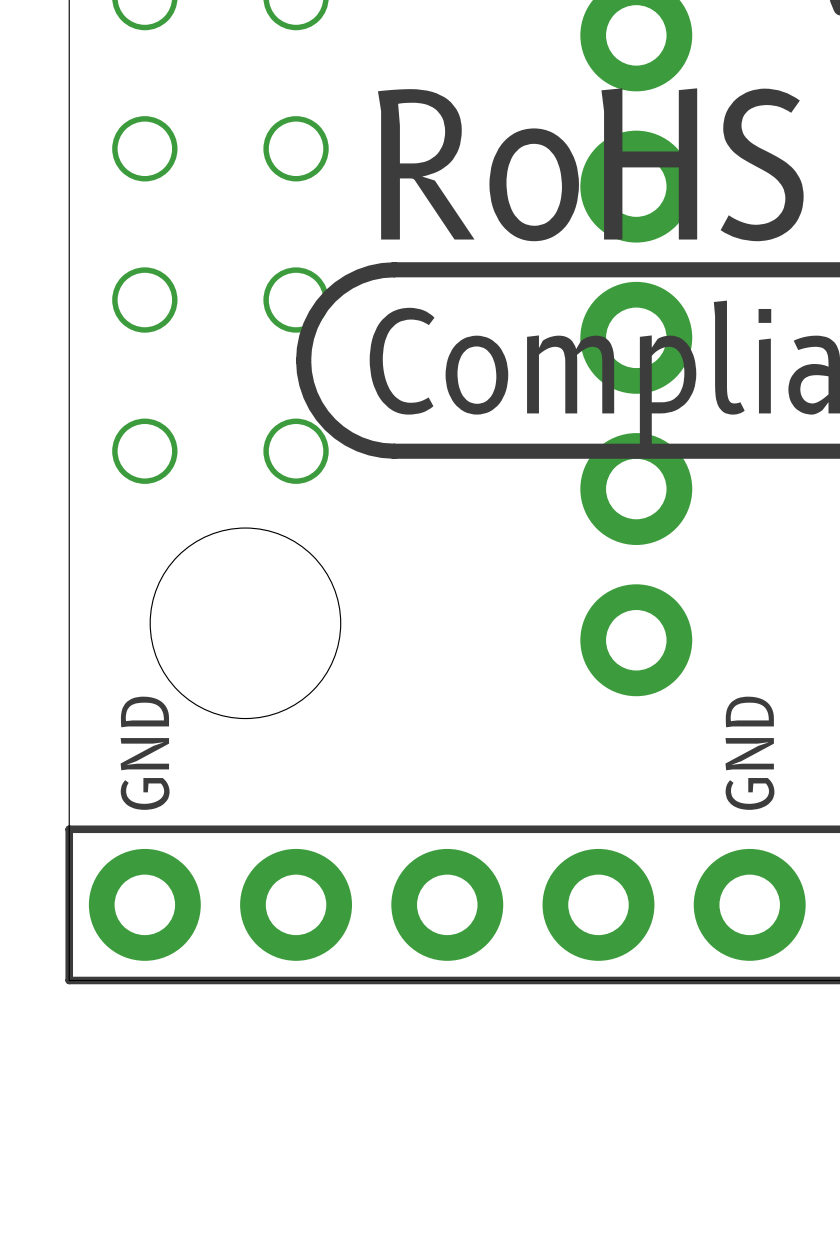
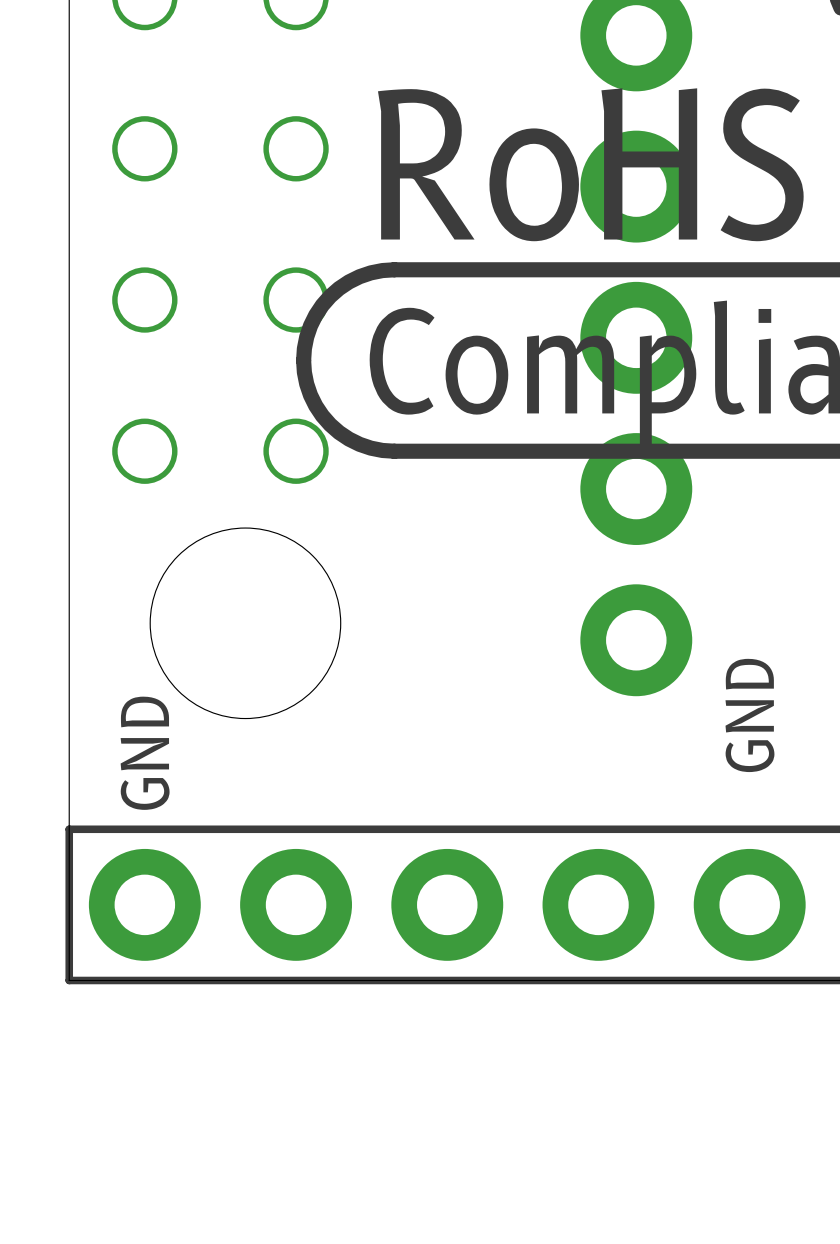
text position: GND (749, 753) -> GND (749, 715)

